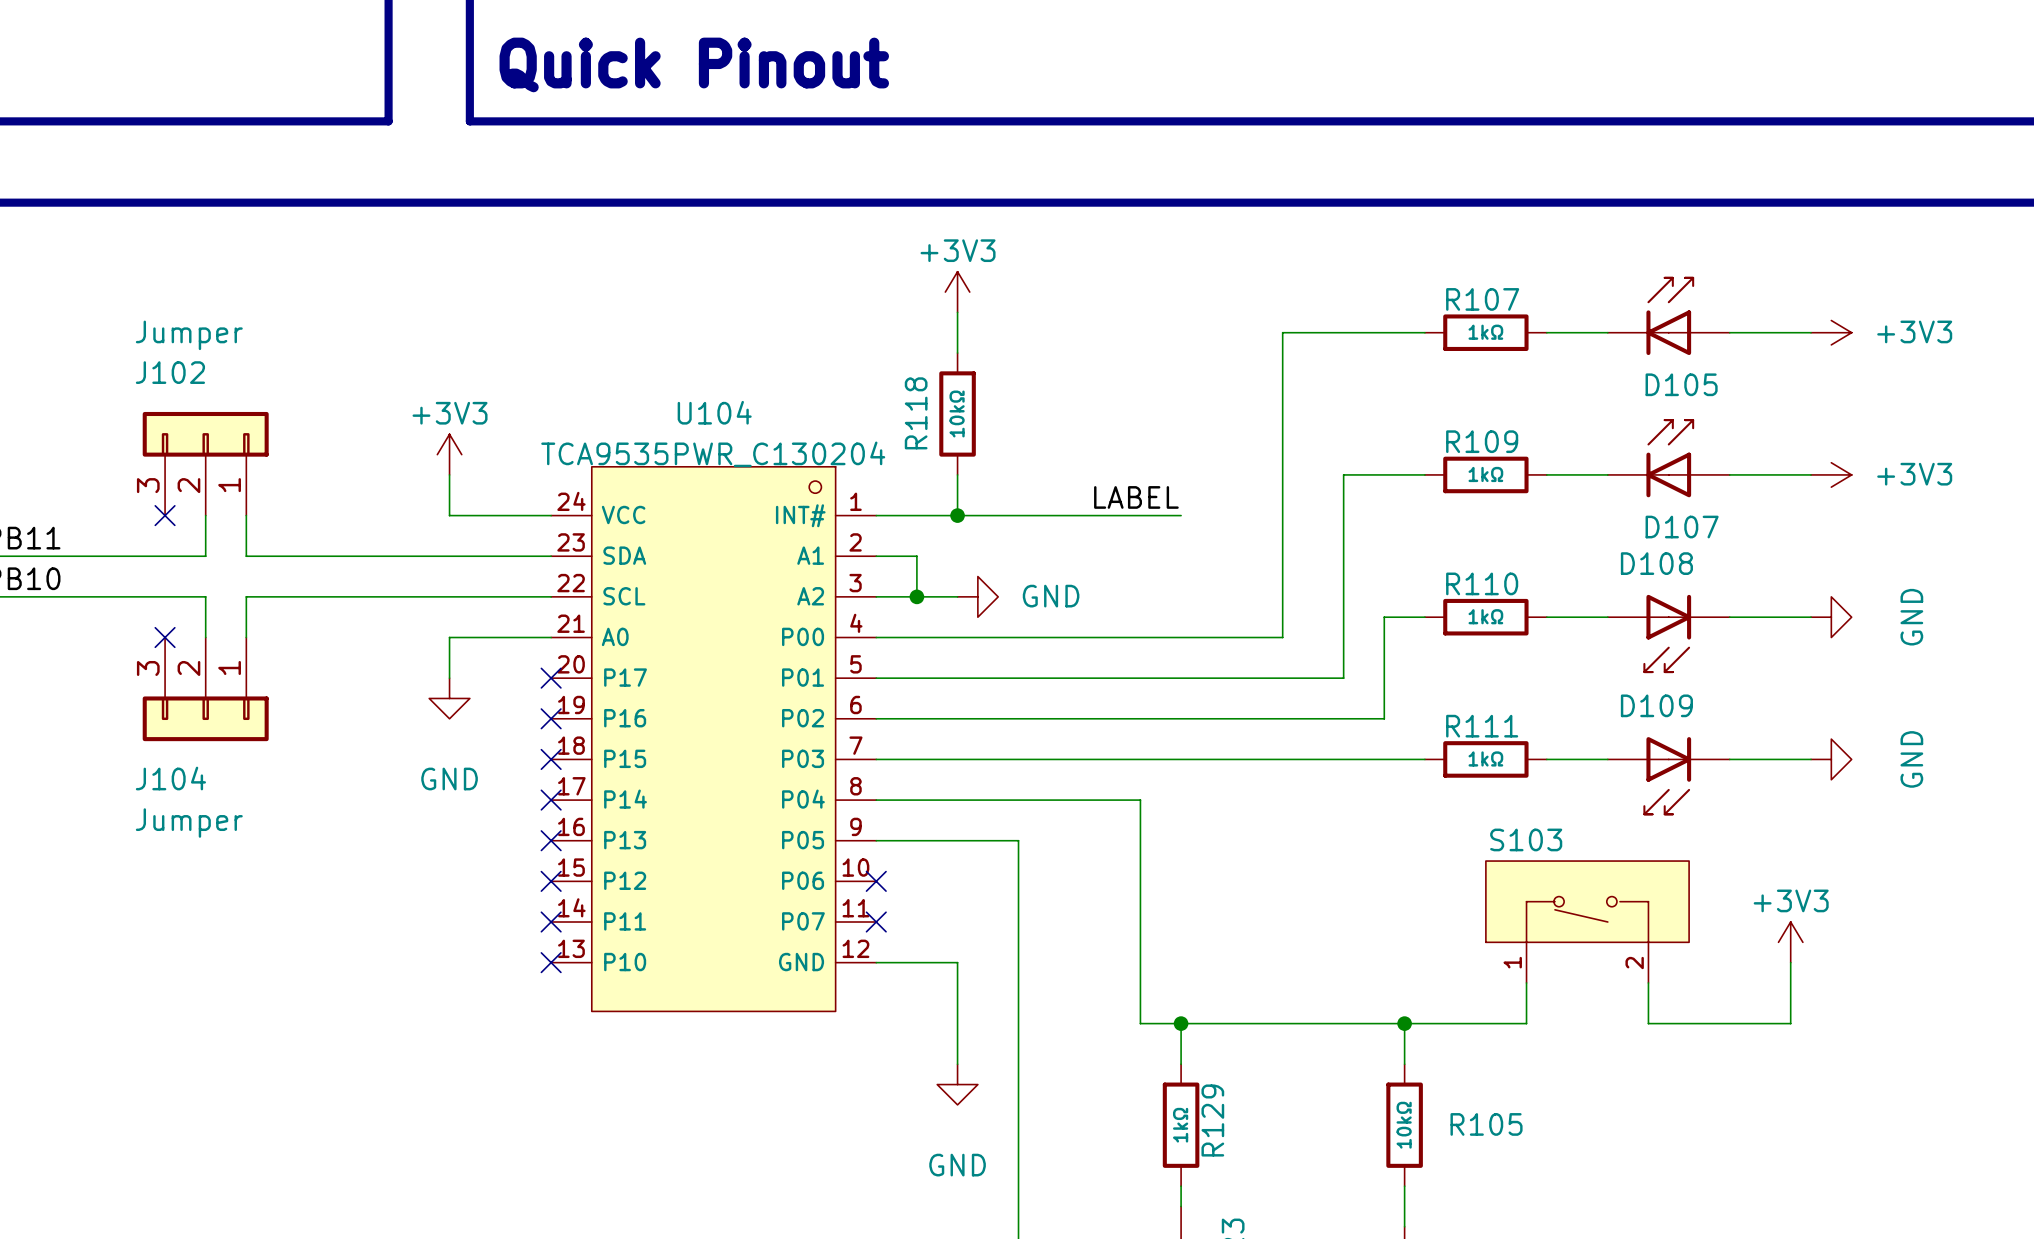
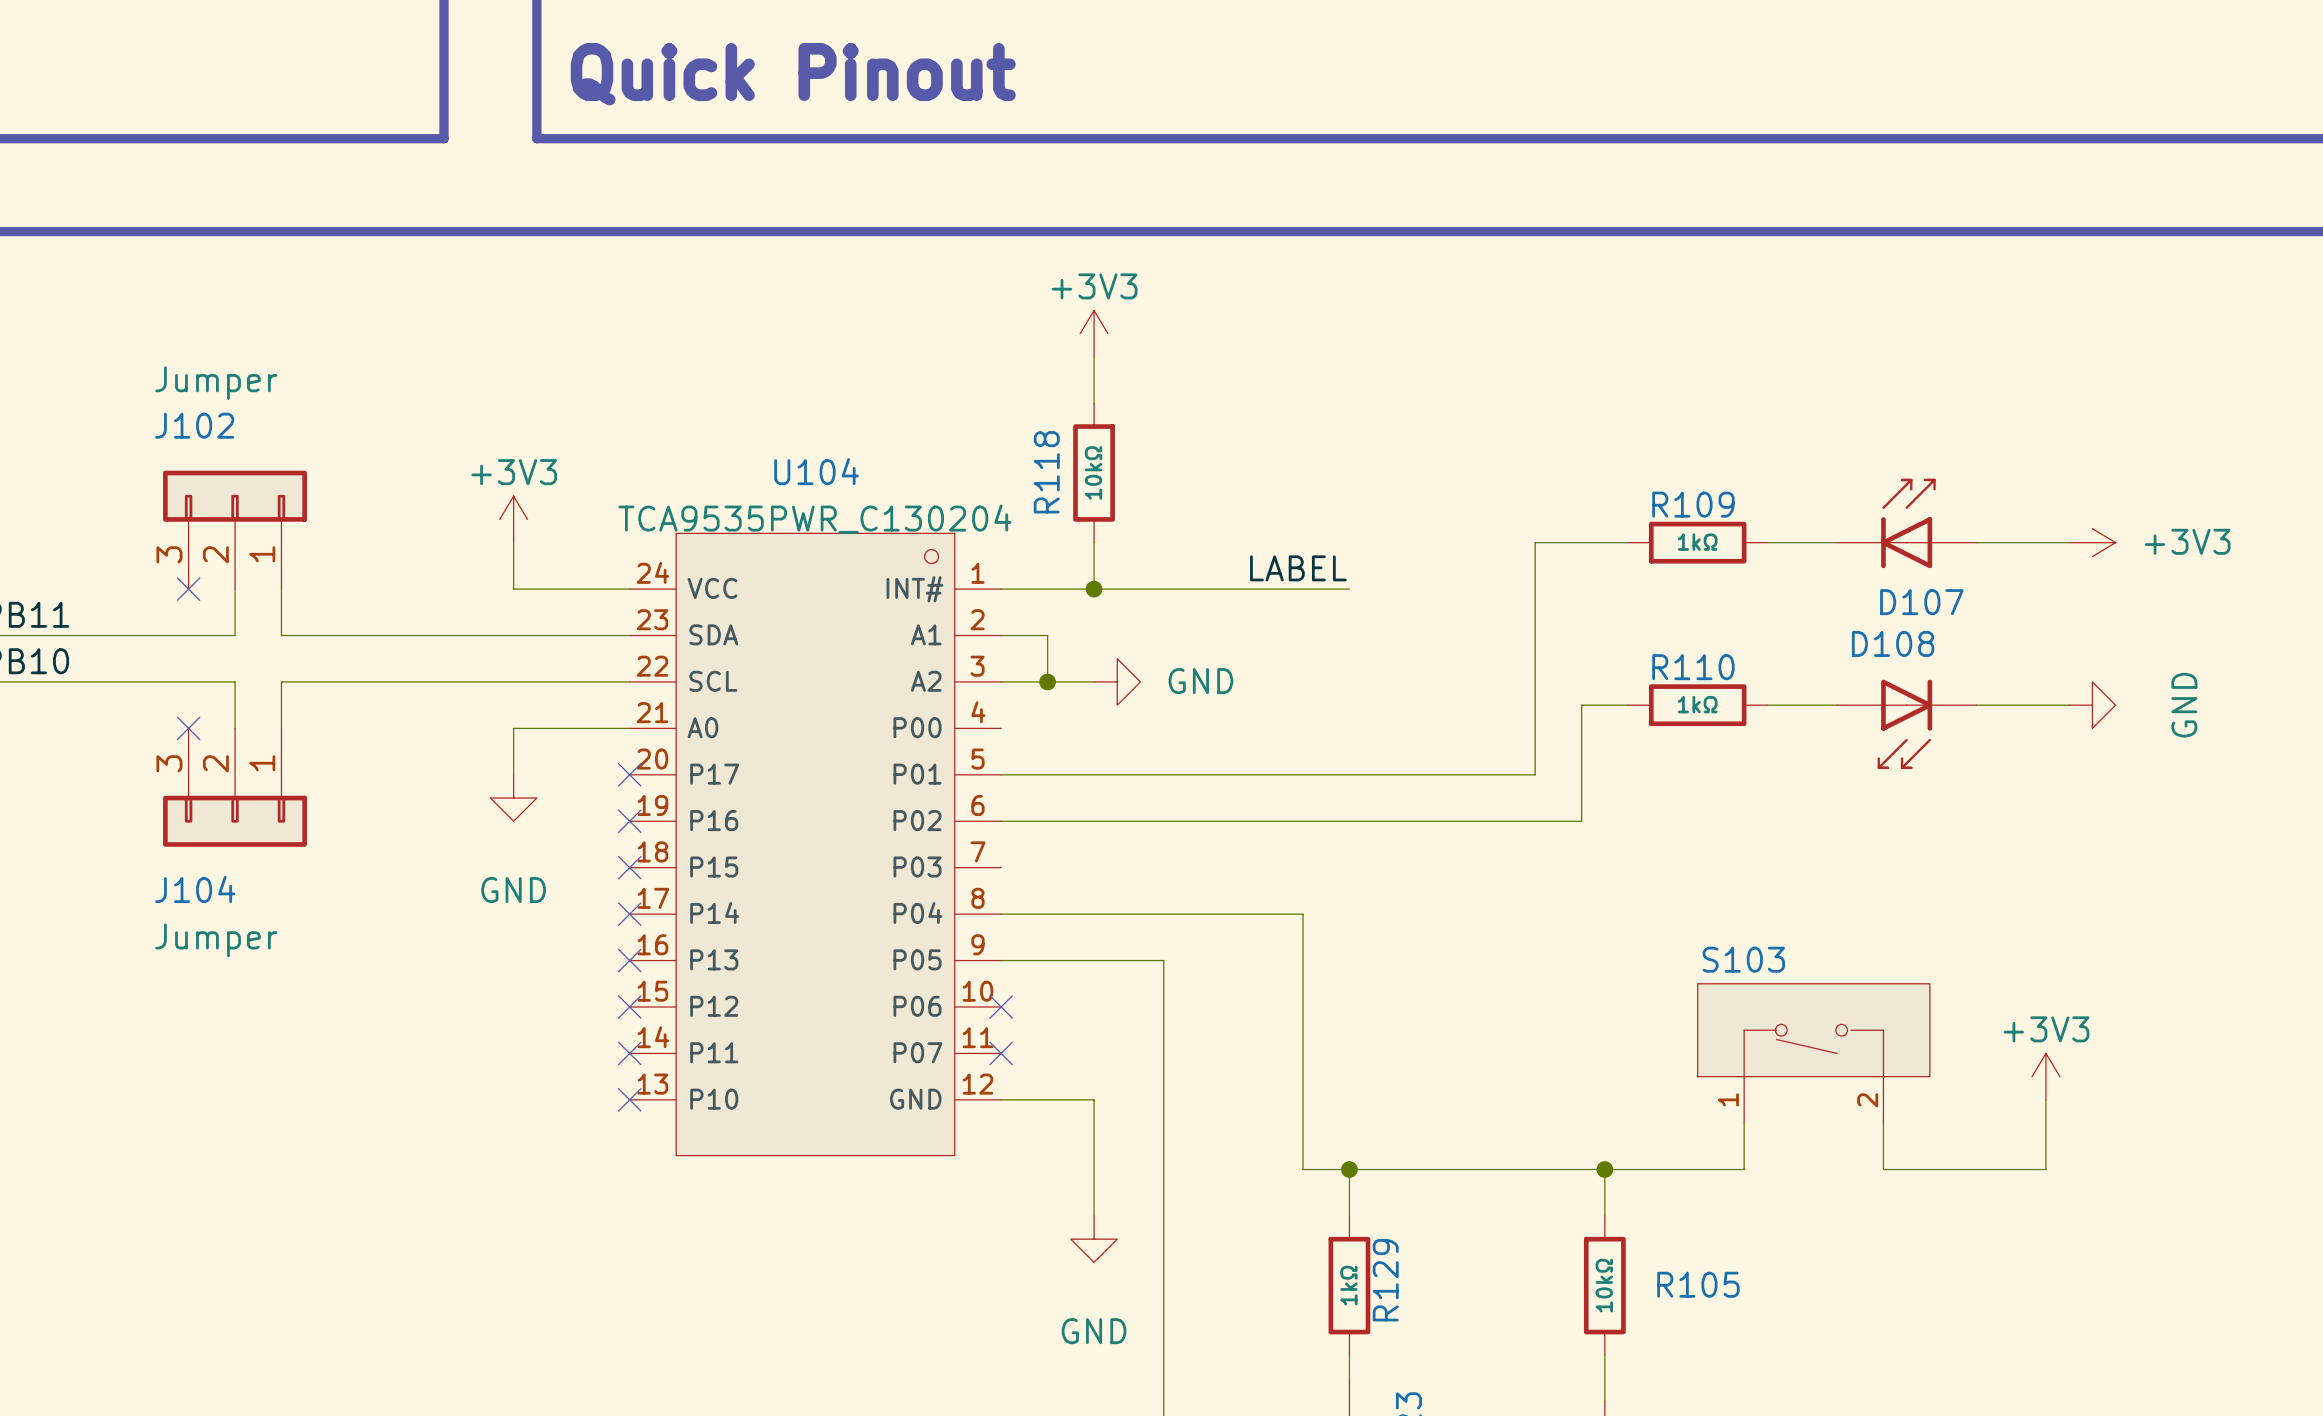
D105: (1668, 315) -> none
wire: (1424, 332) (1282, 332) (1282, 637) (876, 637) -> none
R107: 1kΩ (1485, 332) -> none
wire: (1546, 332) (1607, 332) -> none
wire: (1729, 332) (1811, 332) -> none
power symbol: +3V3 (1831, 332) -> none
wire: (876, 759) (1424, 759) -> none
R111: 1kΩ (1485, 759) -> none
wire: (1546, 759) (1607, 759) -> none
wire: (1729, 759) (1811, 759) -> none
power symbol: GND (1831, 759) -> none
D109: (1668, 776) -> none

